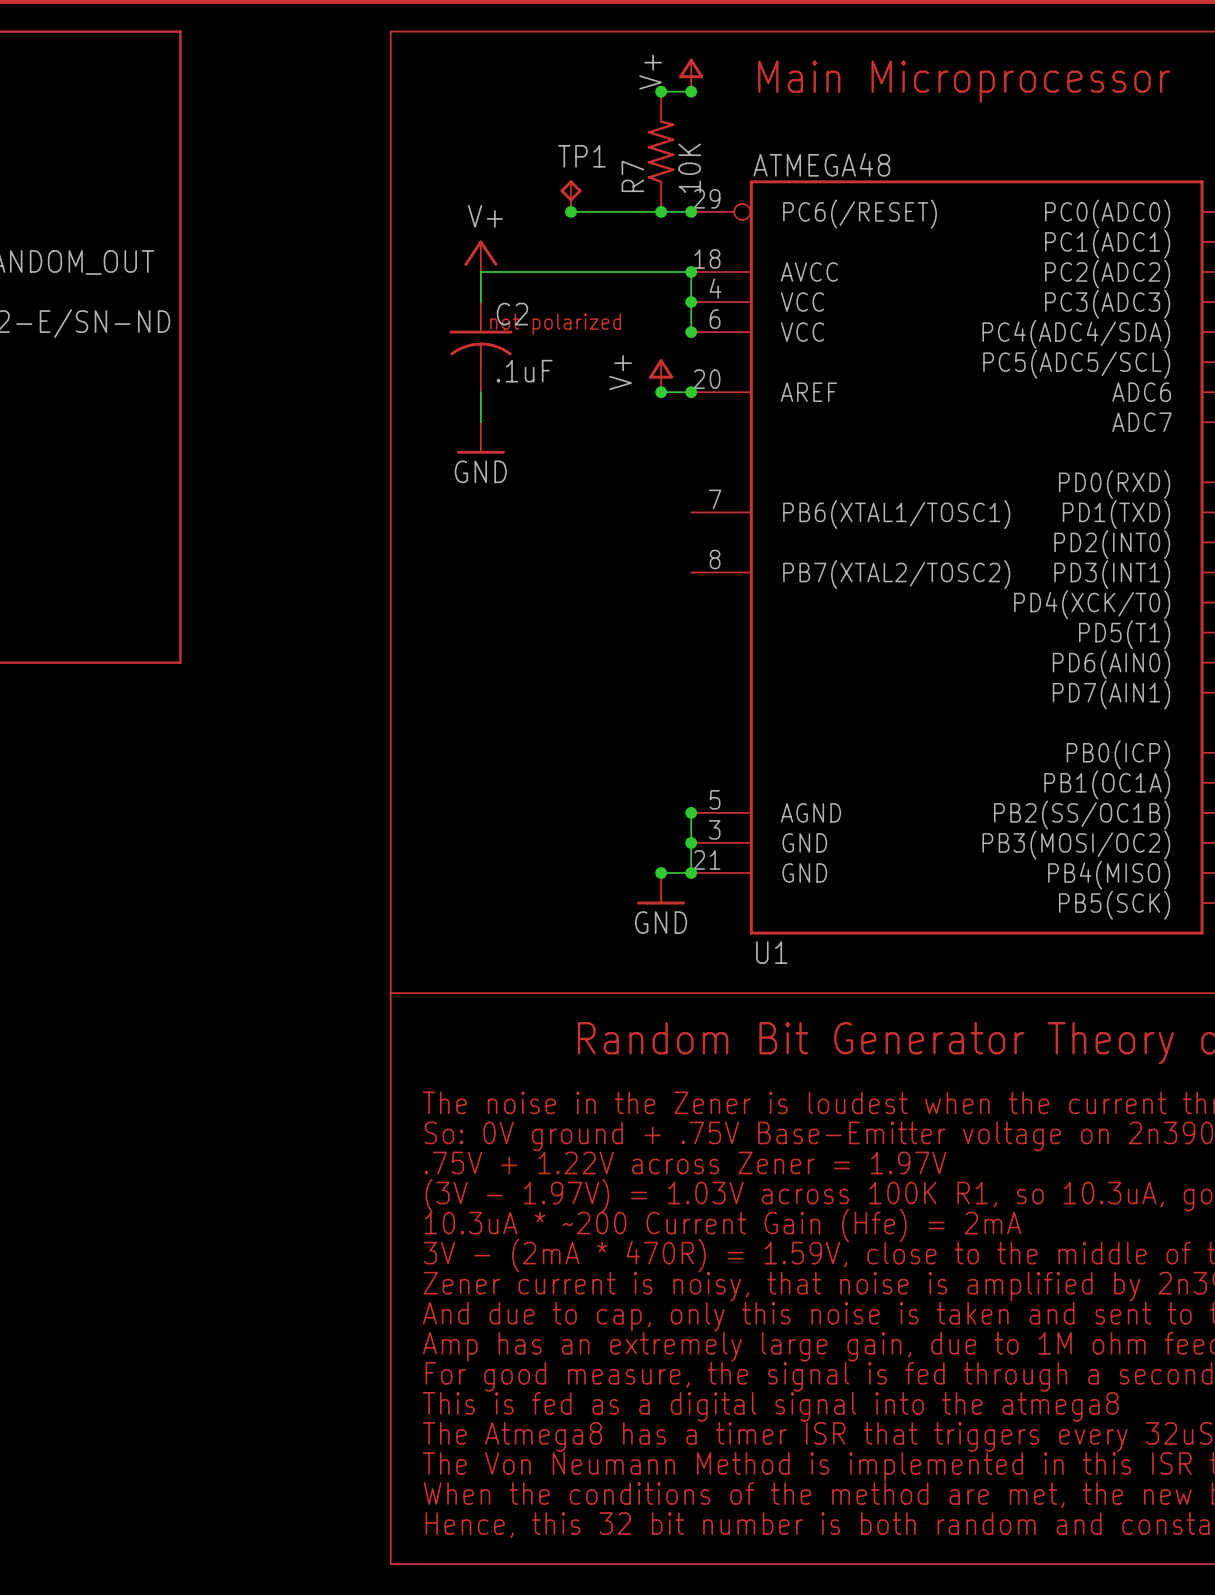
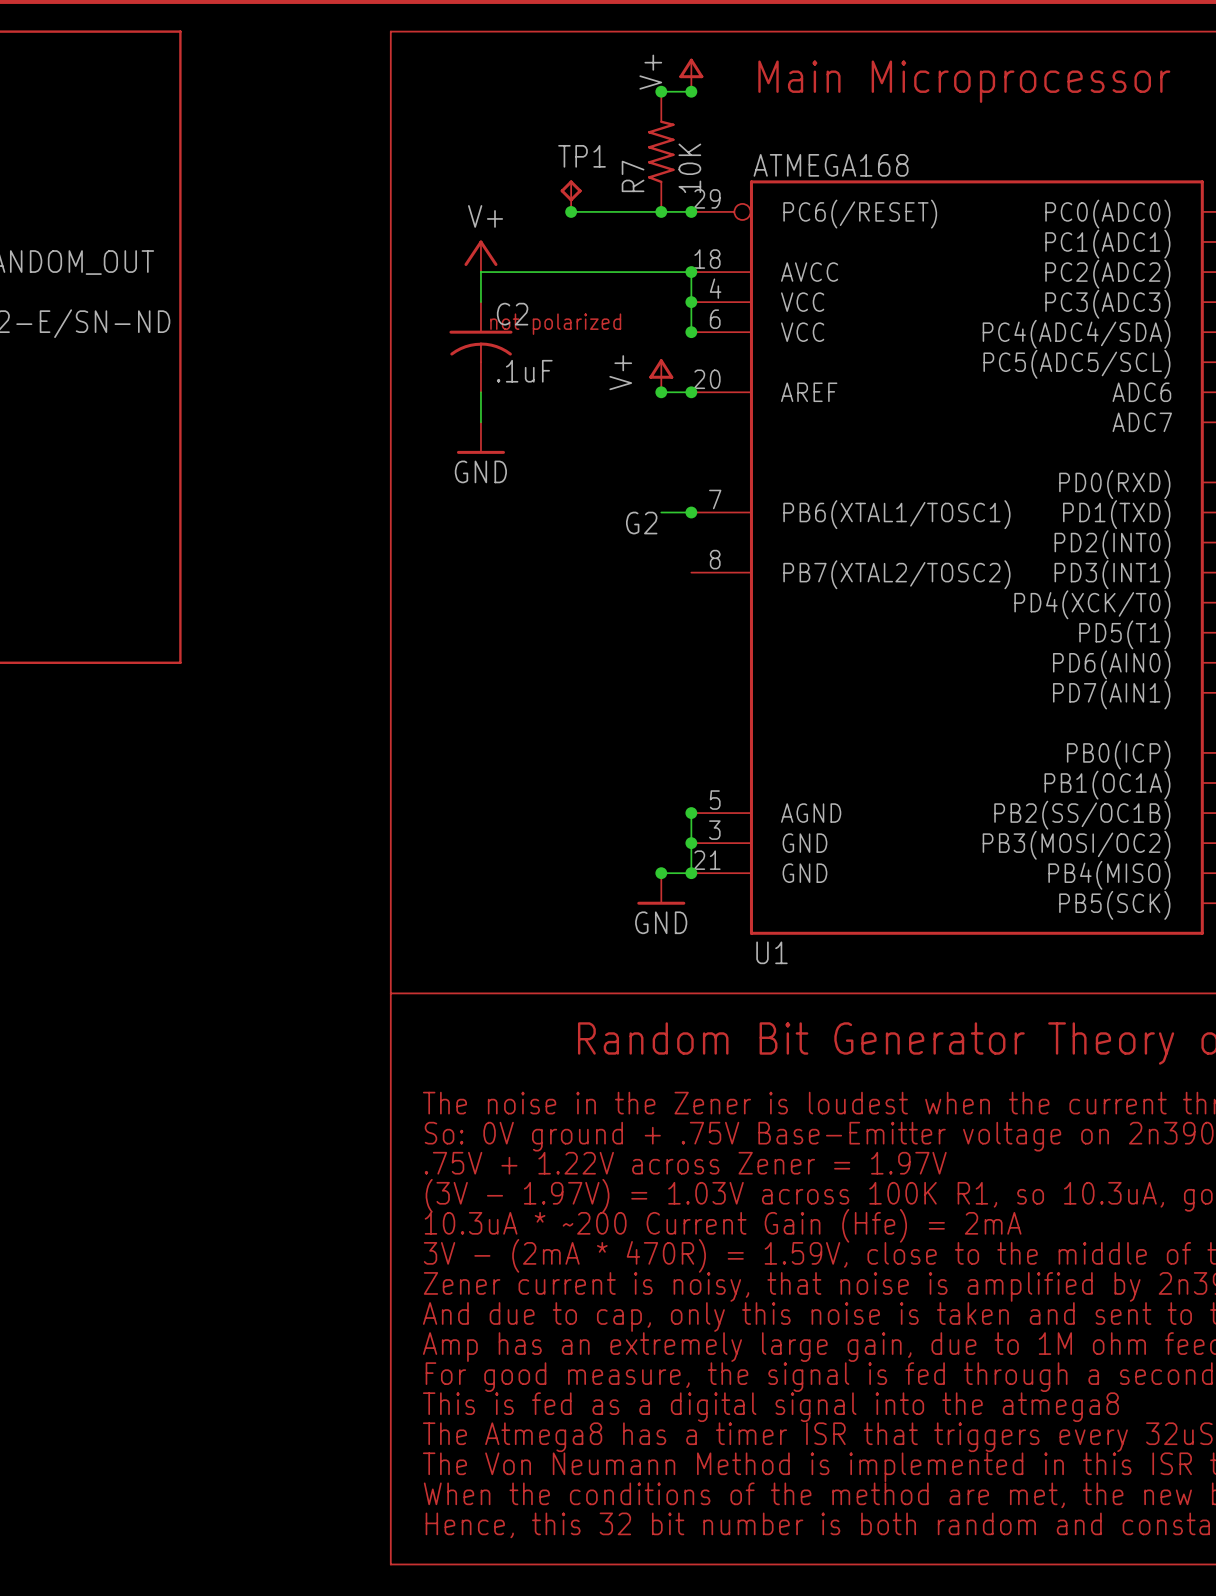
U1 value: ATMEGA48 (821, 164) -> ATMEGA168 (831, 165)
wire: none -> (661, 512) (691, 512)
junction: none -> (691, 512)
label: none -> G2 (641, 523)

